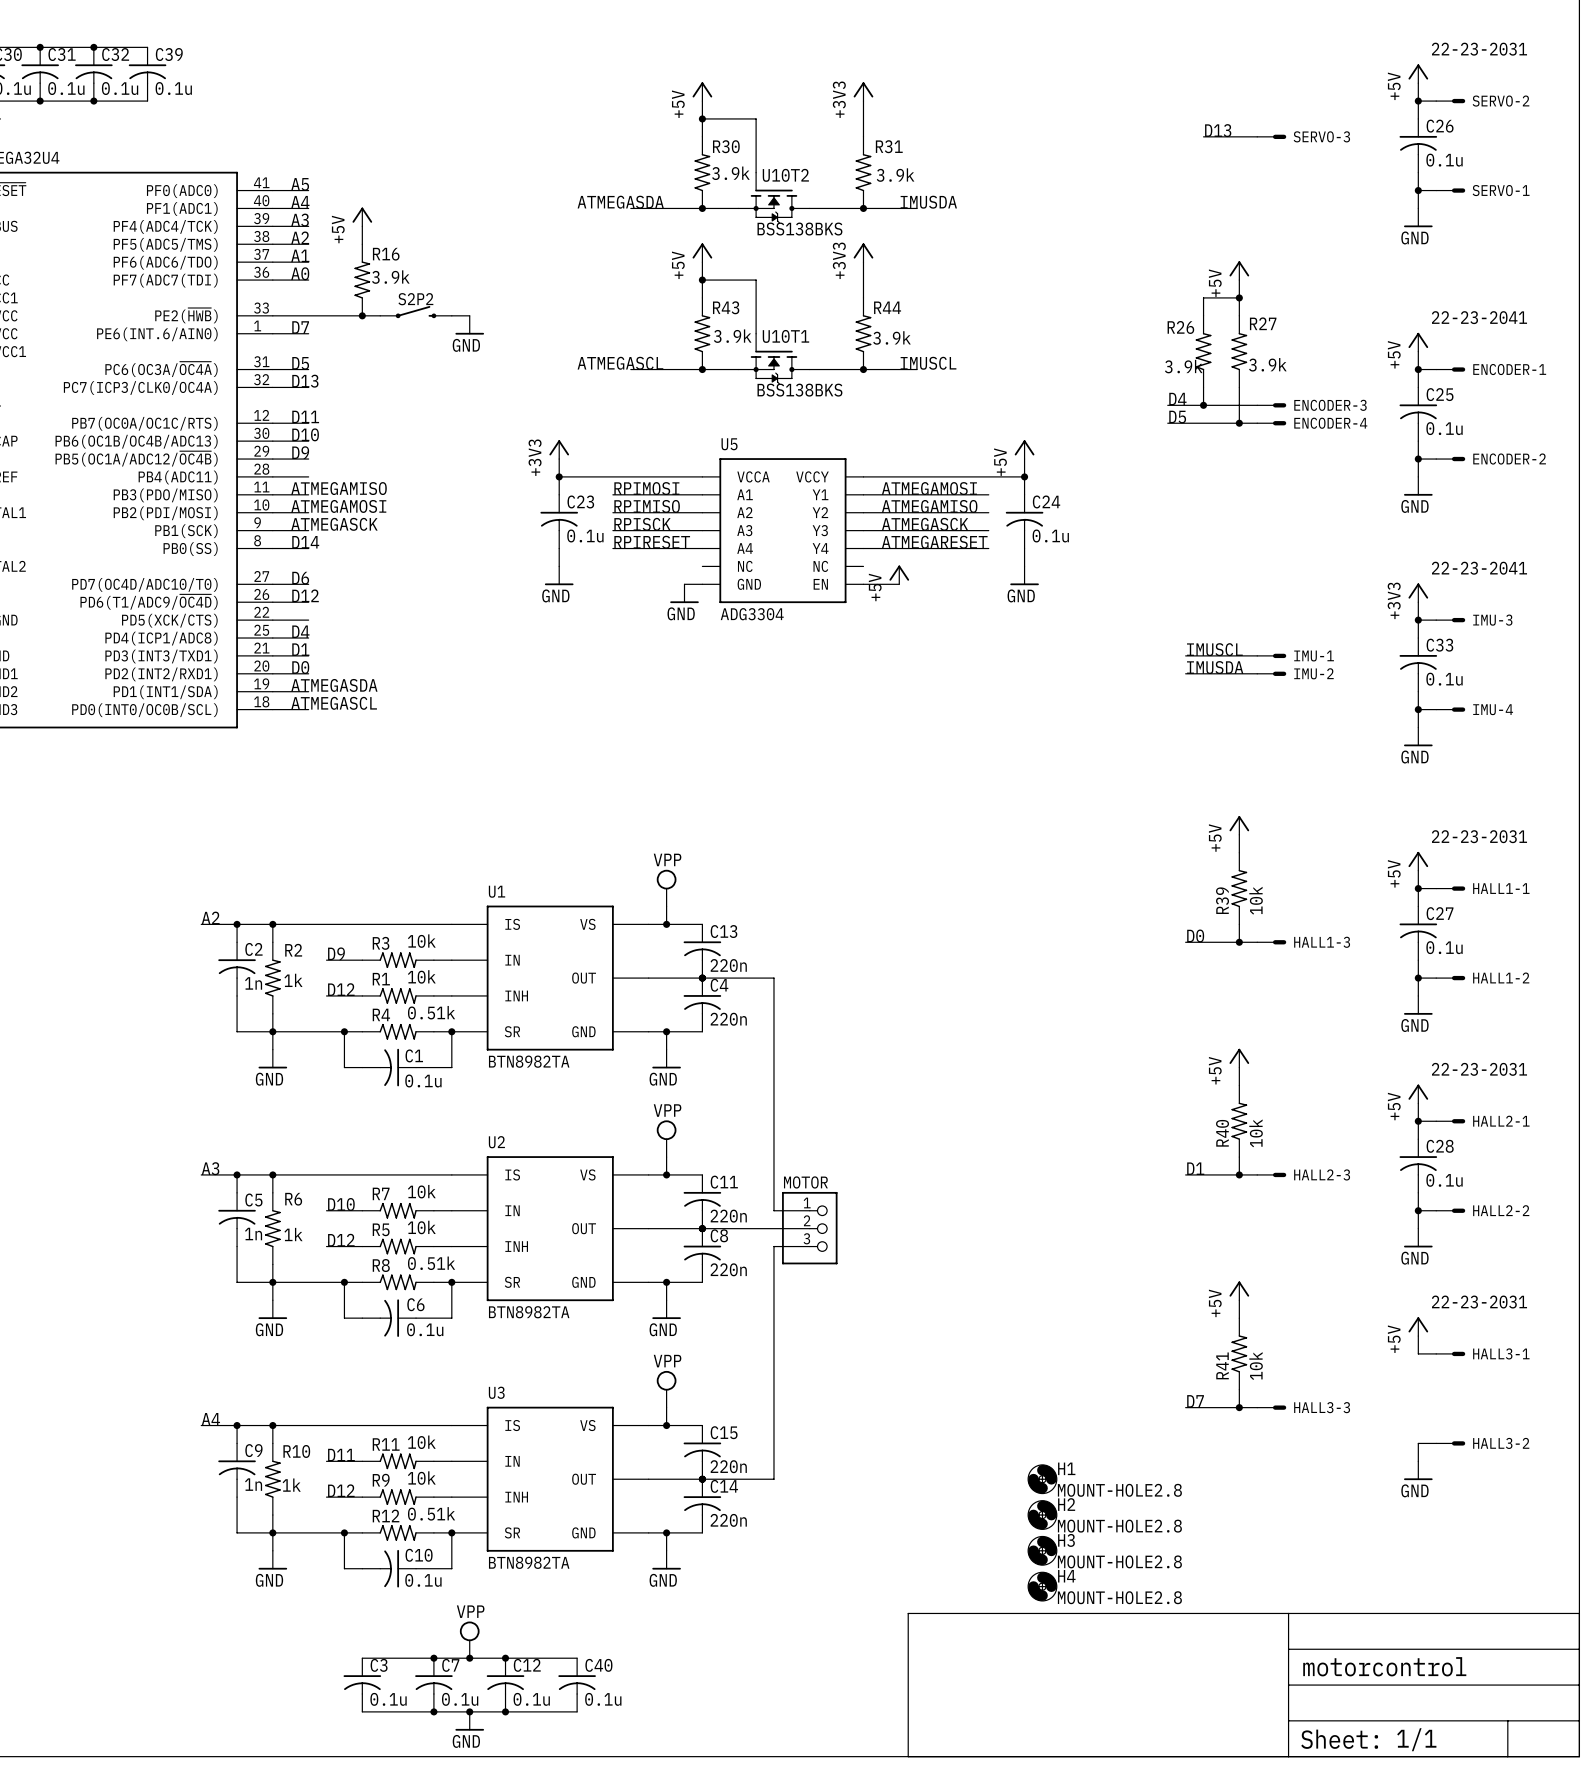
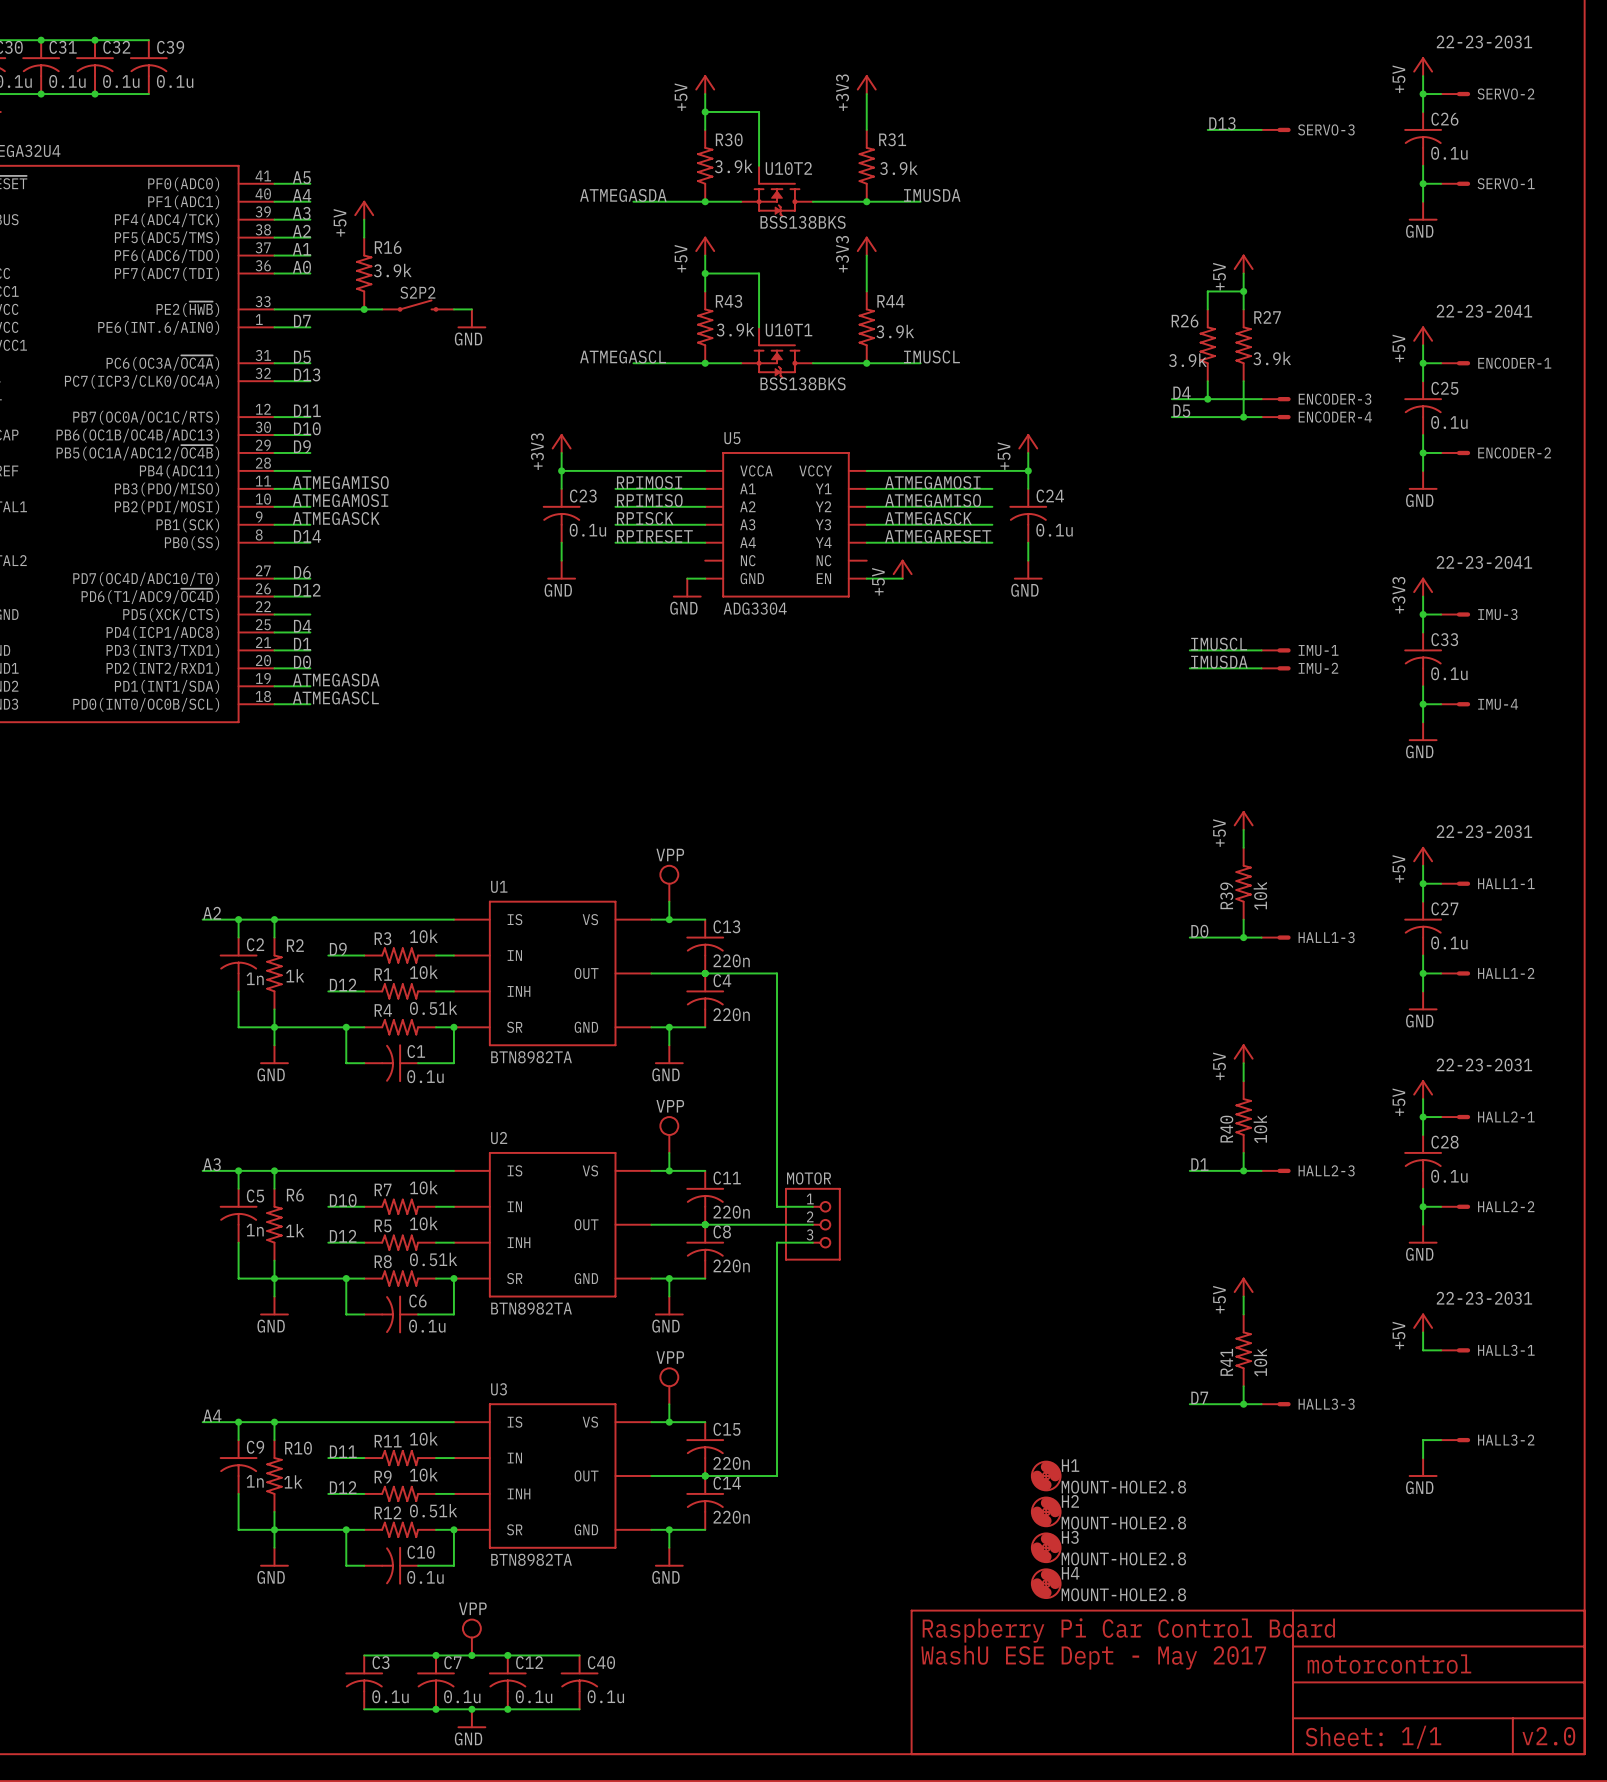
text: none -> Raspberry Pi Car Control Board (1128, 1630)
text: none -> WashU ESE Dept - May 2017 (1093, 1657)
text: none -> v2.0 (1548, 1736)

